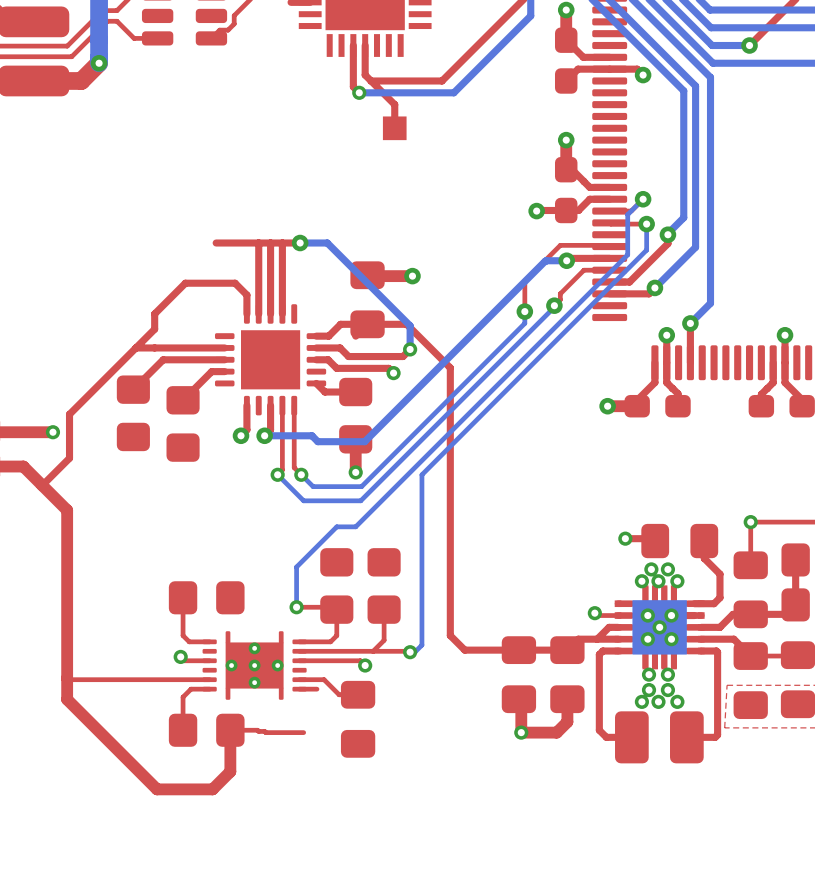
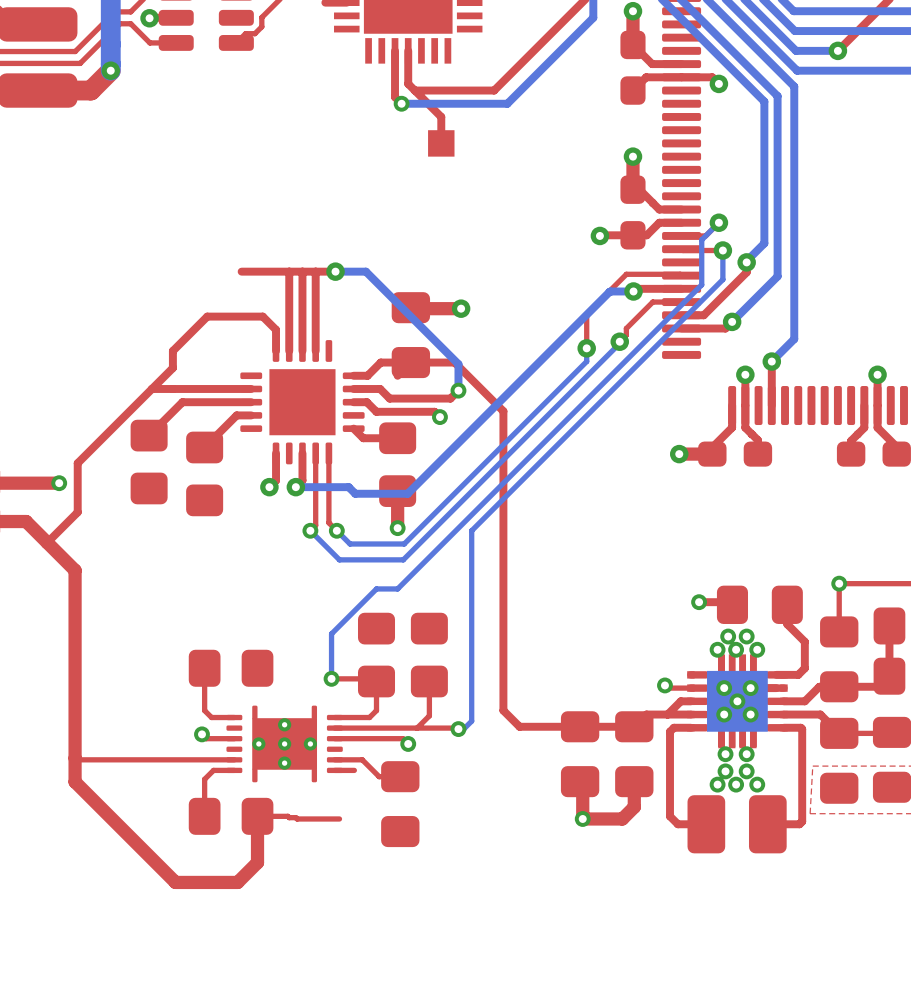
via: none -> (149, 18)

